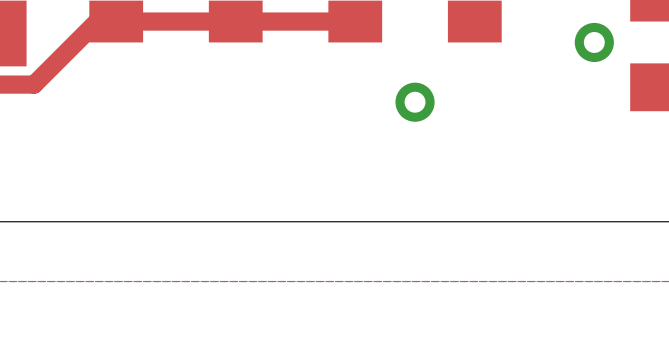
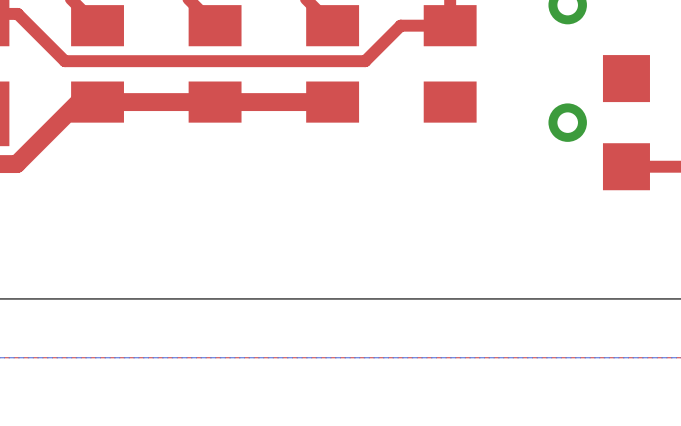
via: (415, 102) -> none

